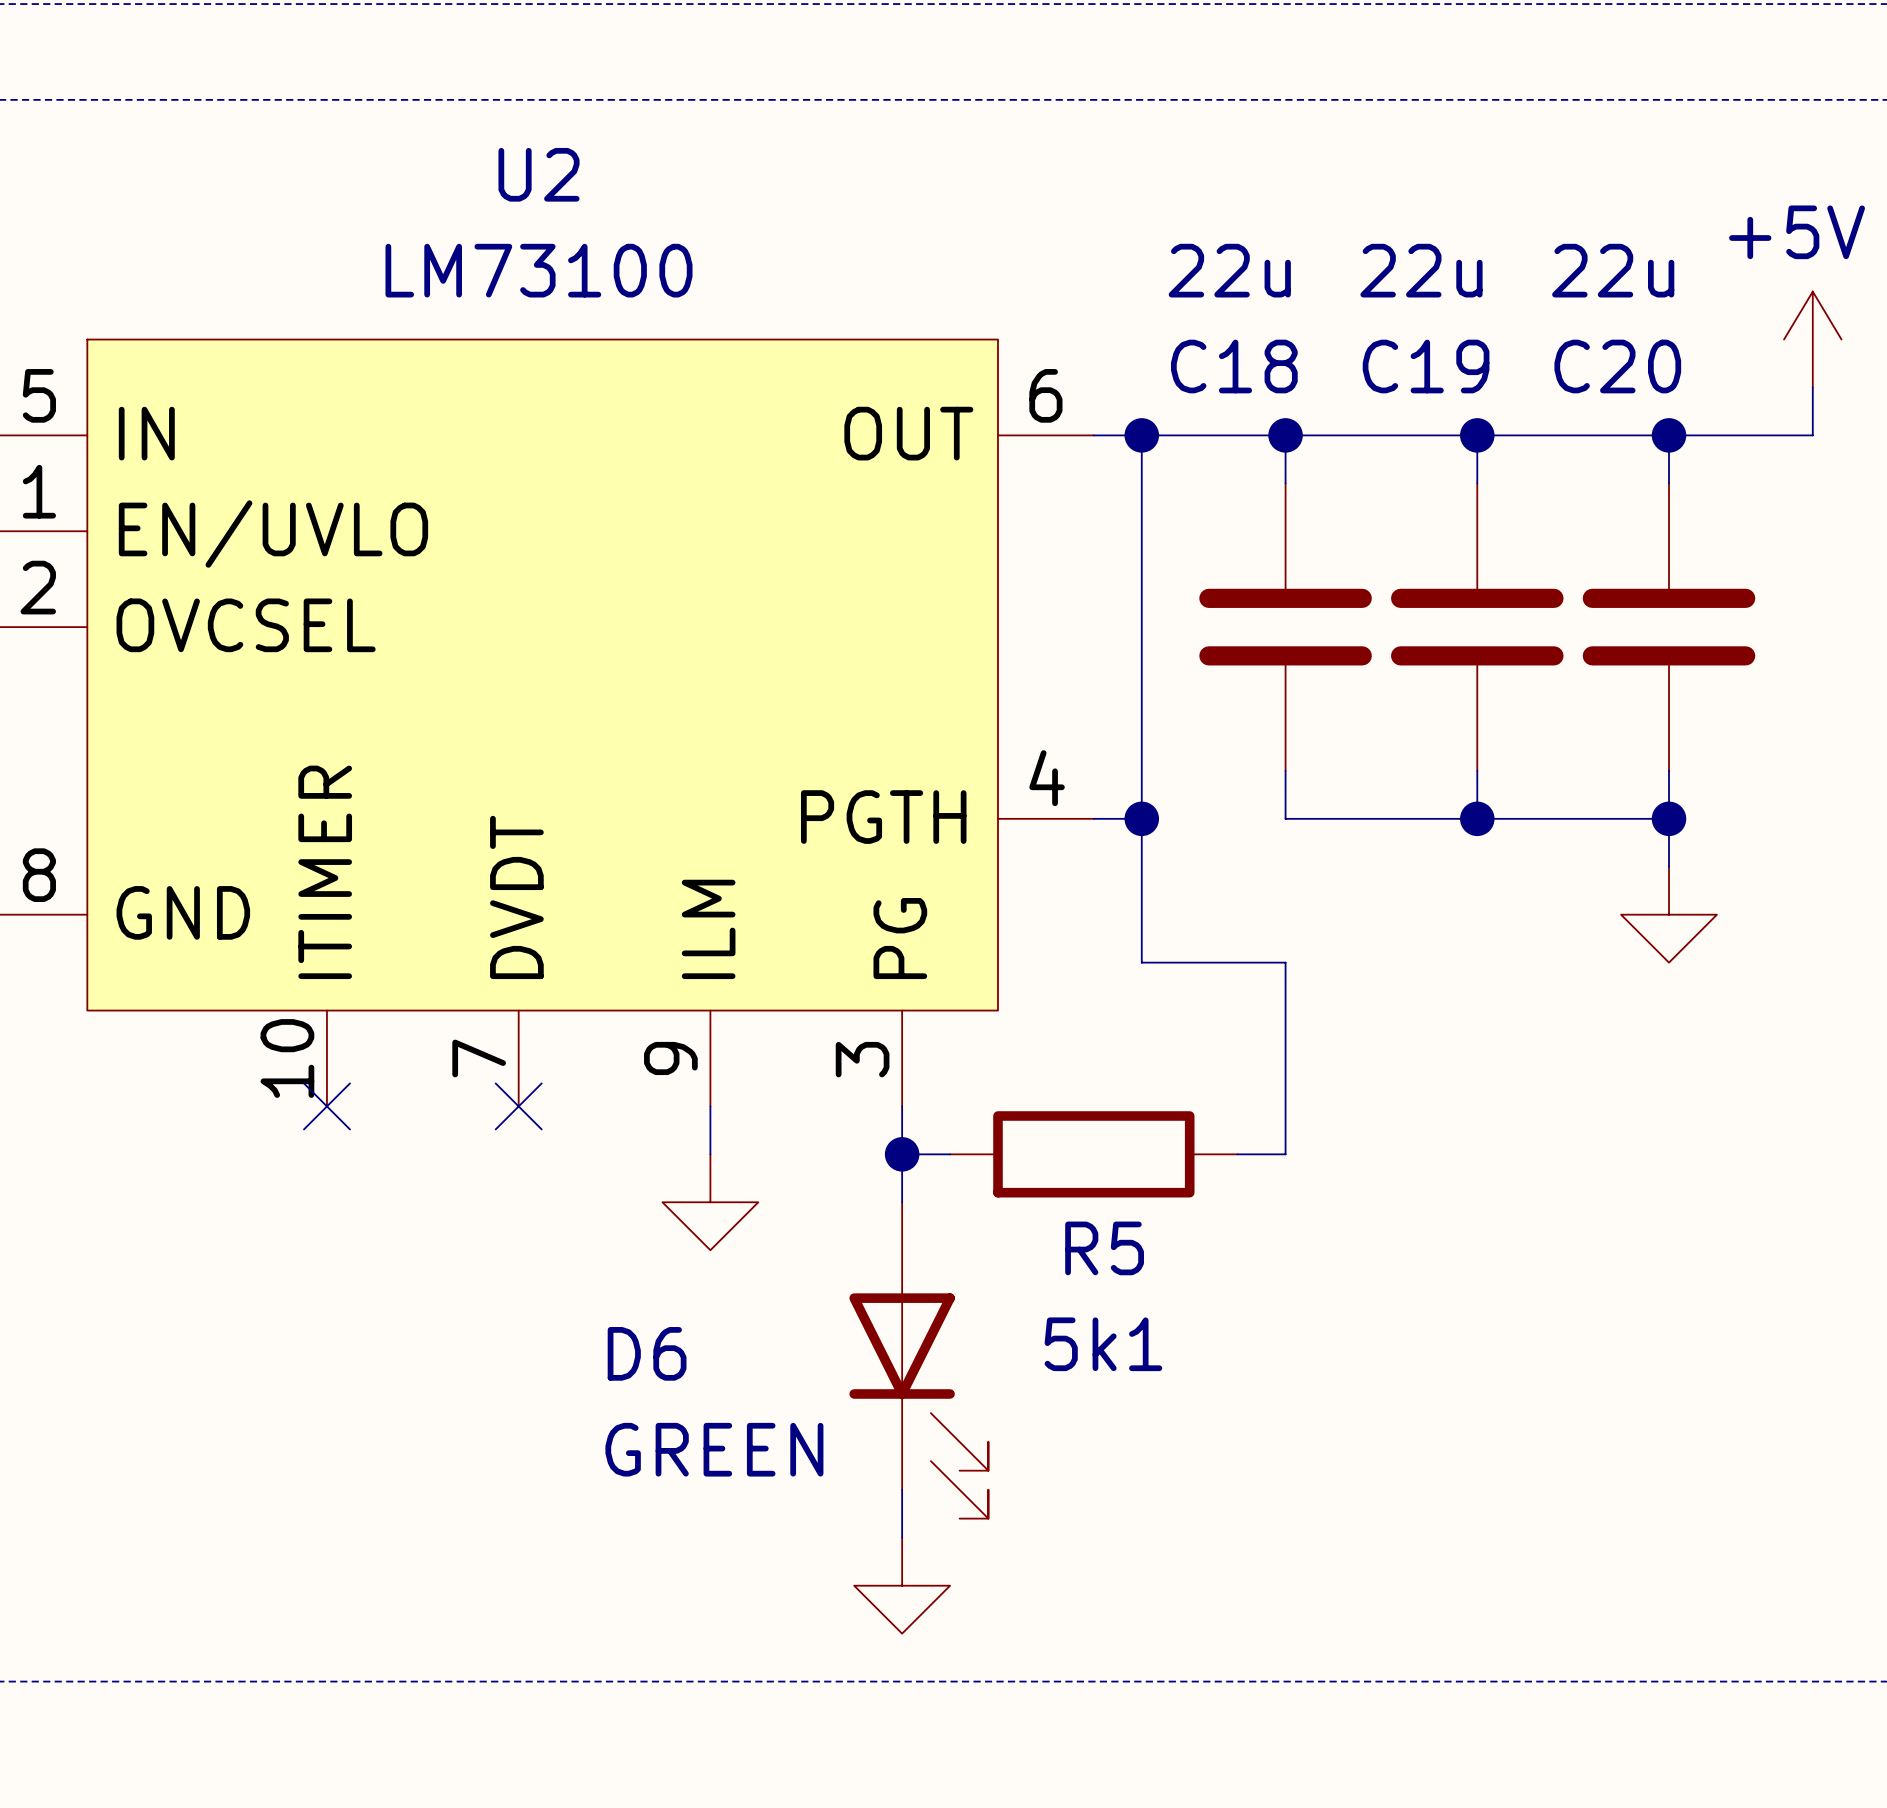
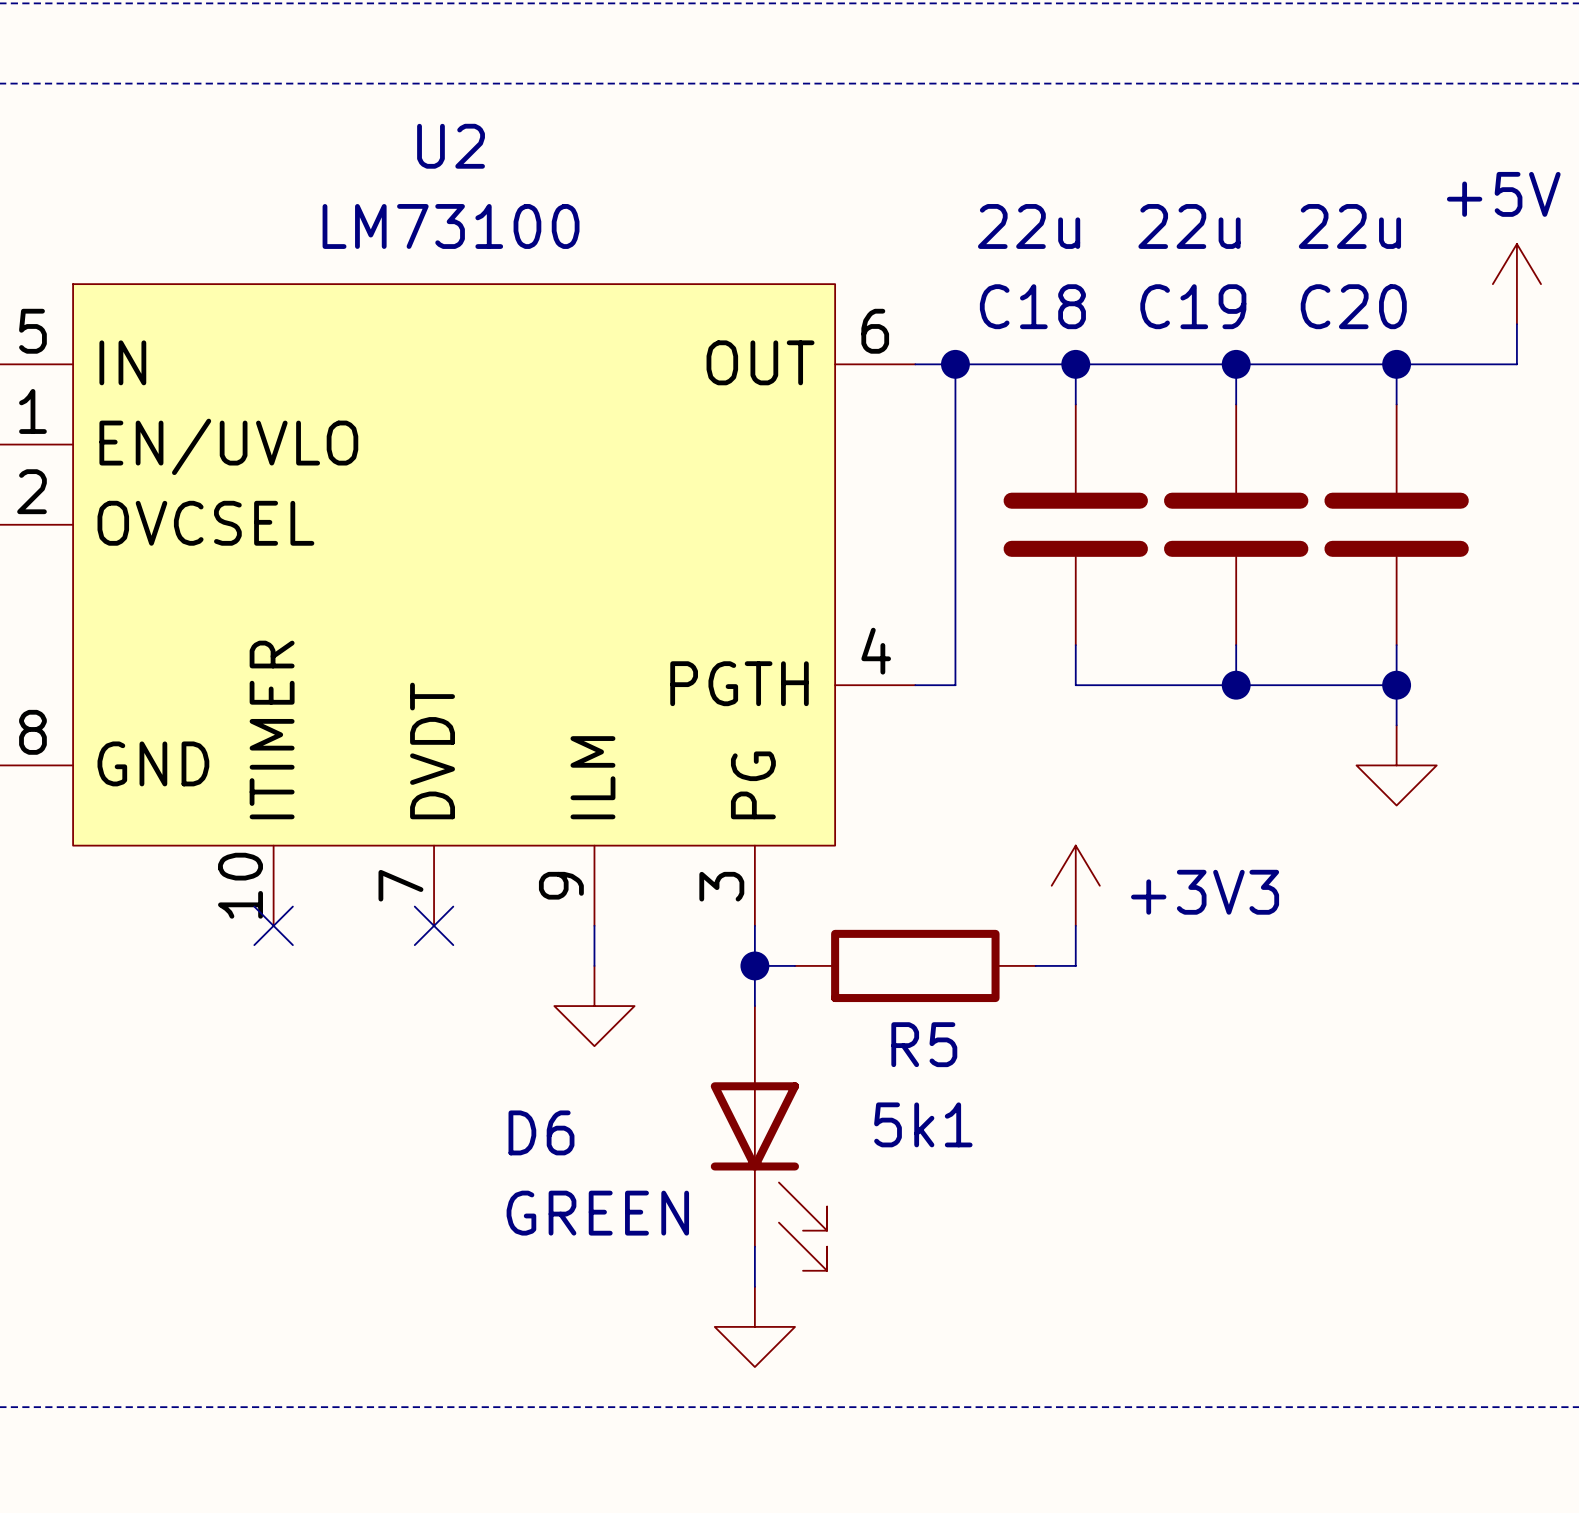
wire: (1141, 818) (1141, 962) (1285, 962) (1285, 1106) -> none
junction: (1141, 818) -> none
power symbol: none -> +3V3 (1075, 885)

